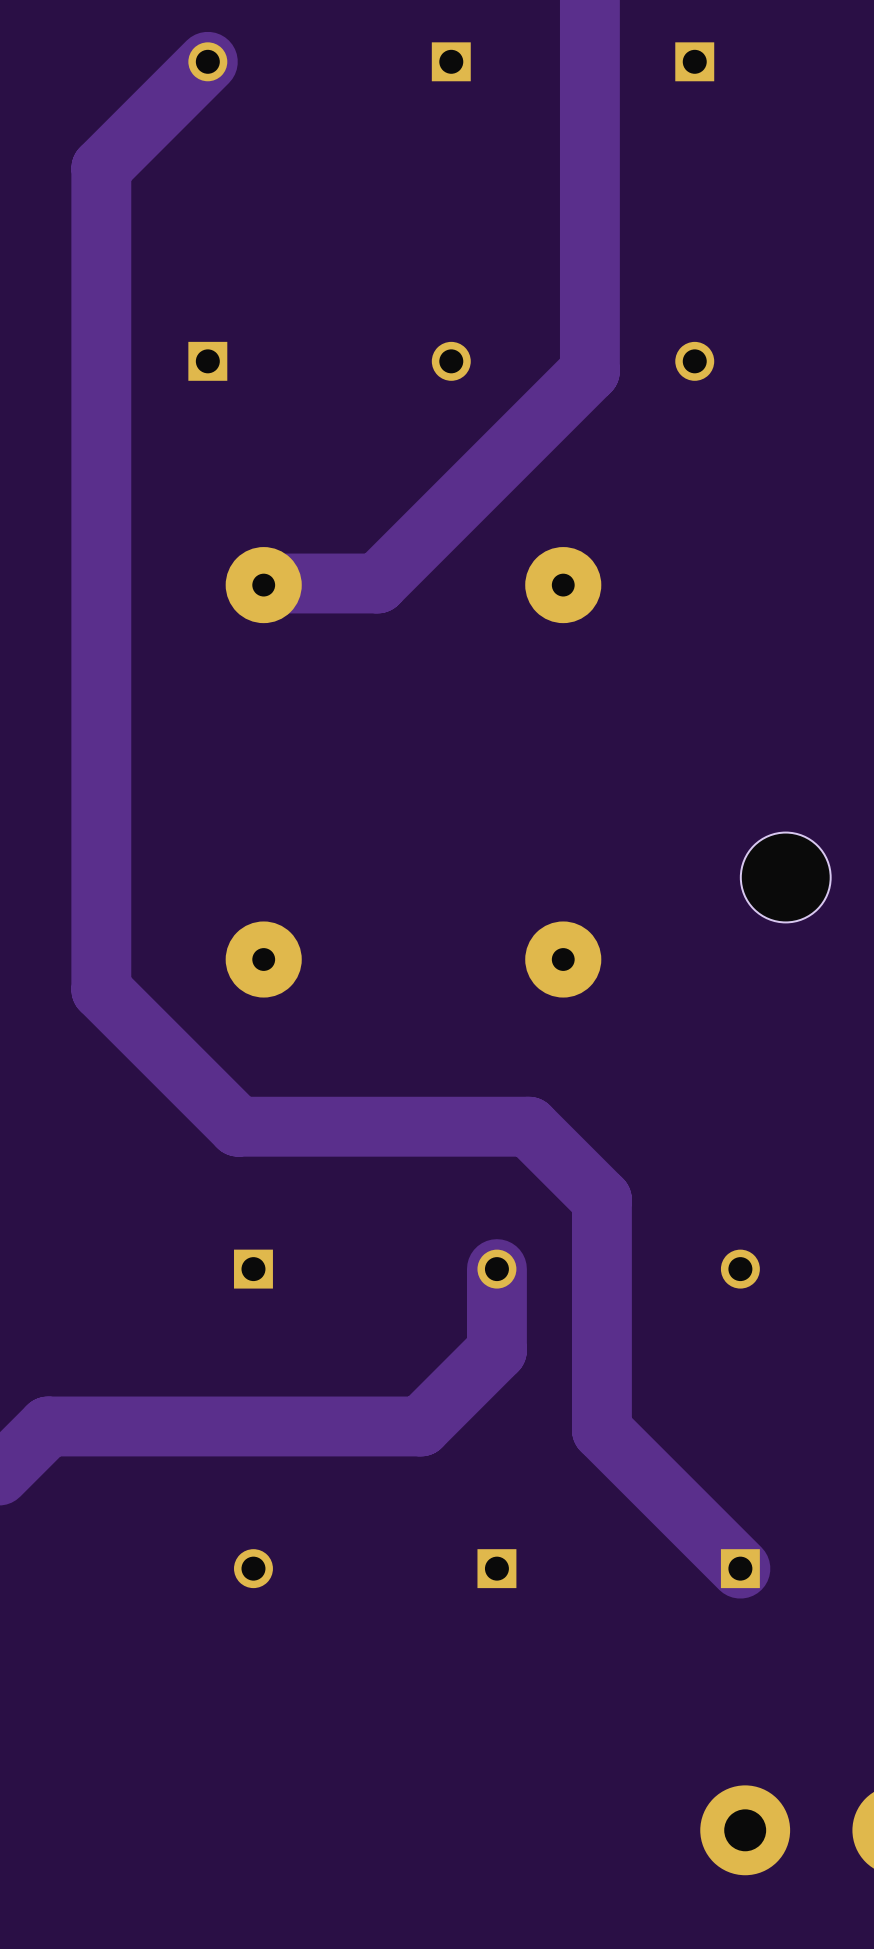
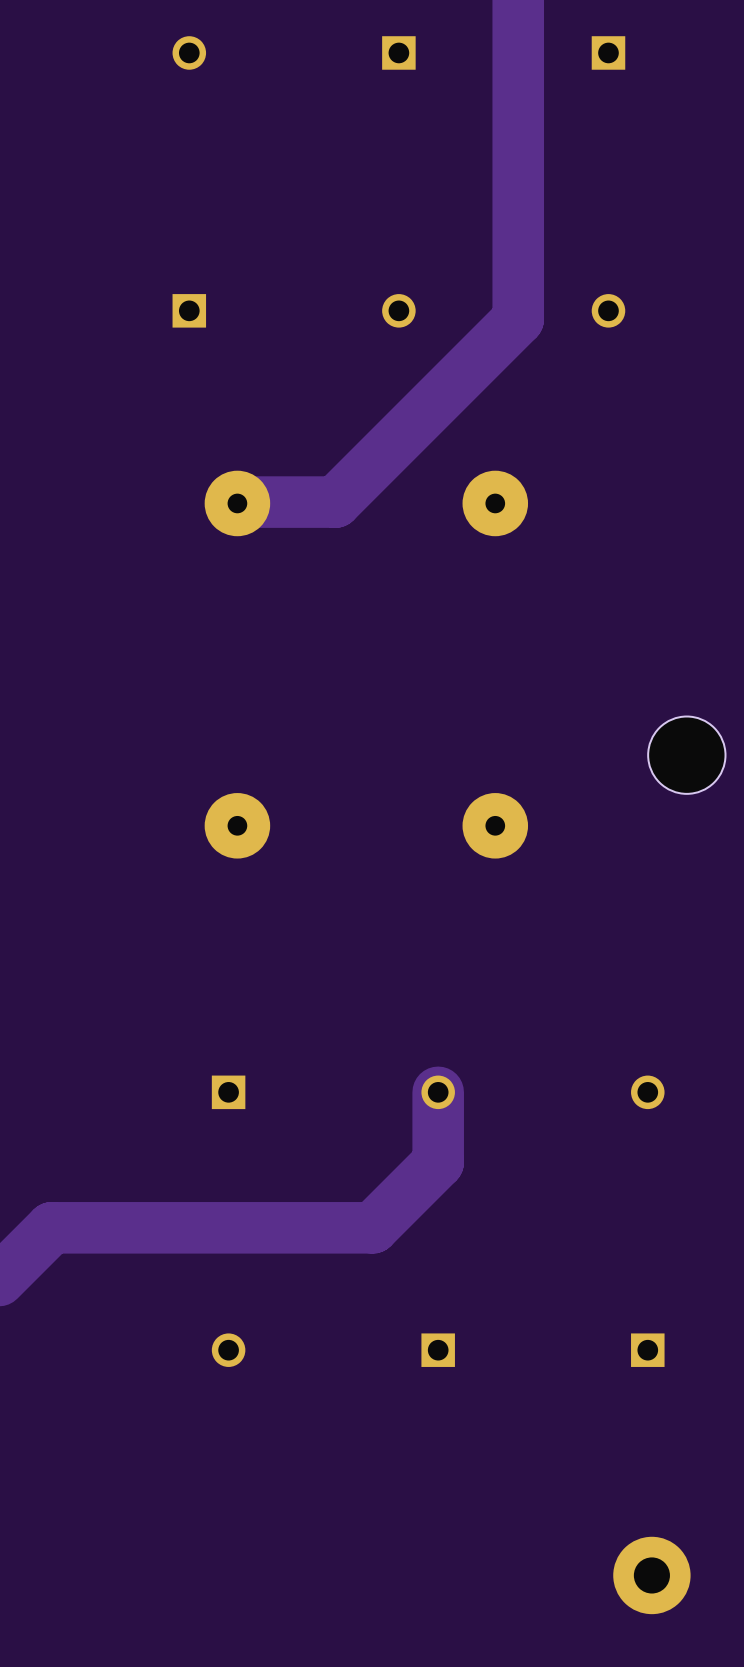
track: (207, 61) (101, 168) (101, 989) (238, 1126) (528, 1126) (601, 1199) (601, 1430) (740, 1568) -> none

